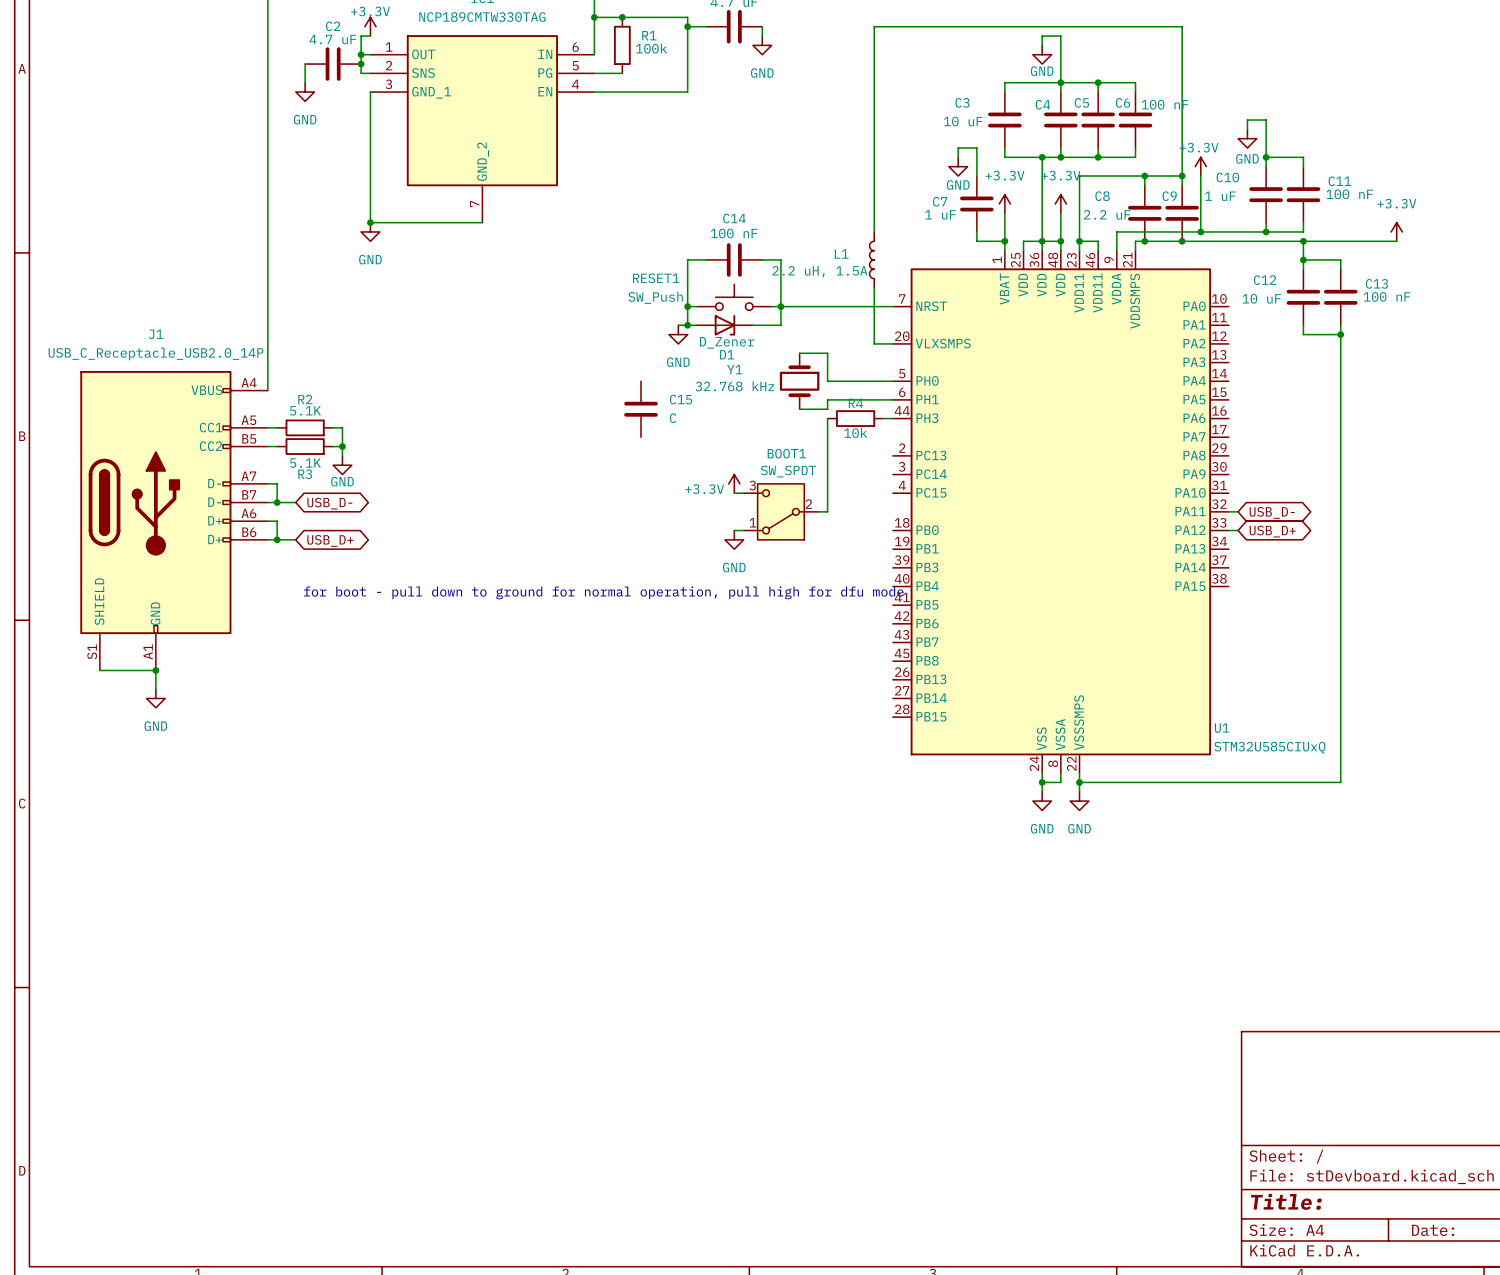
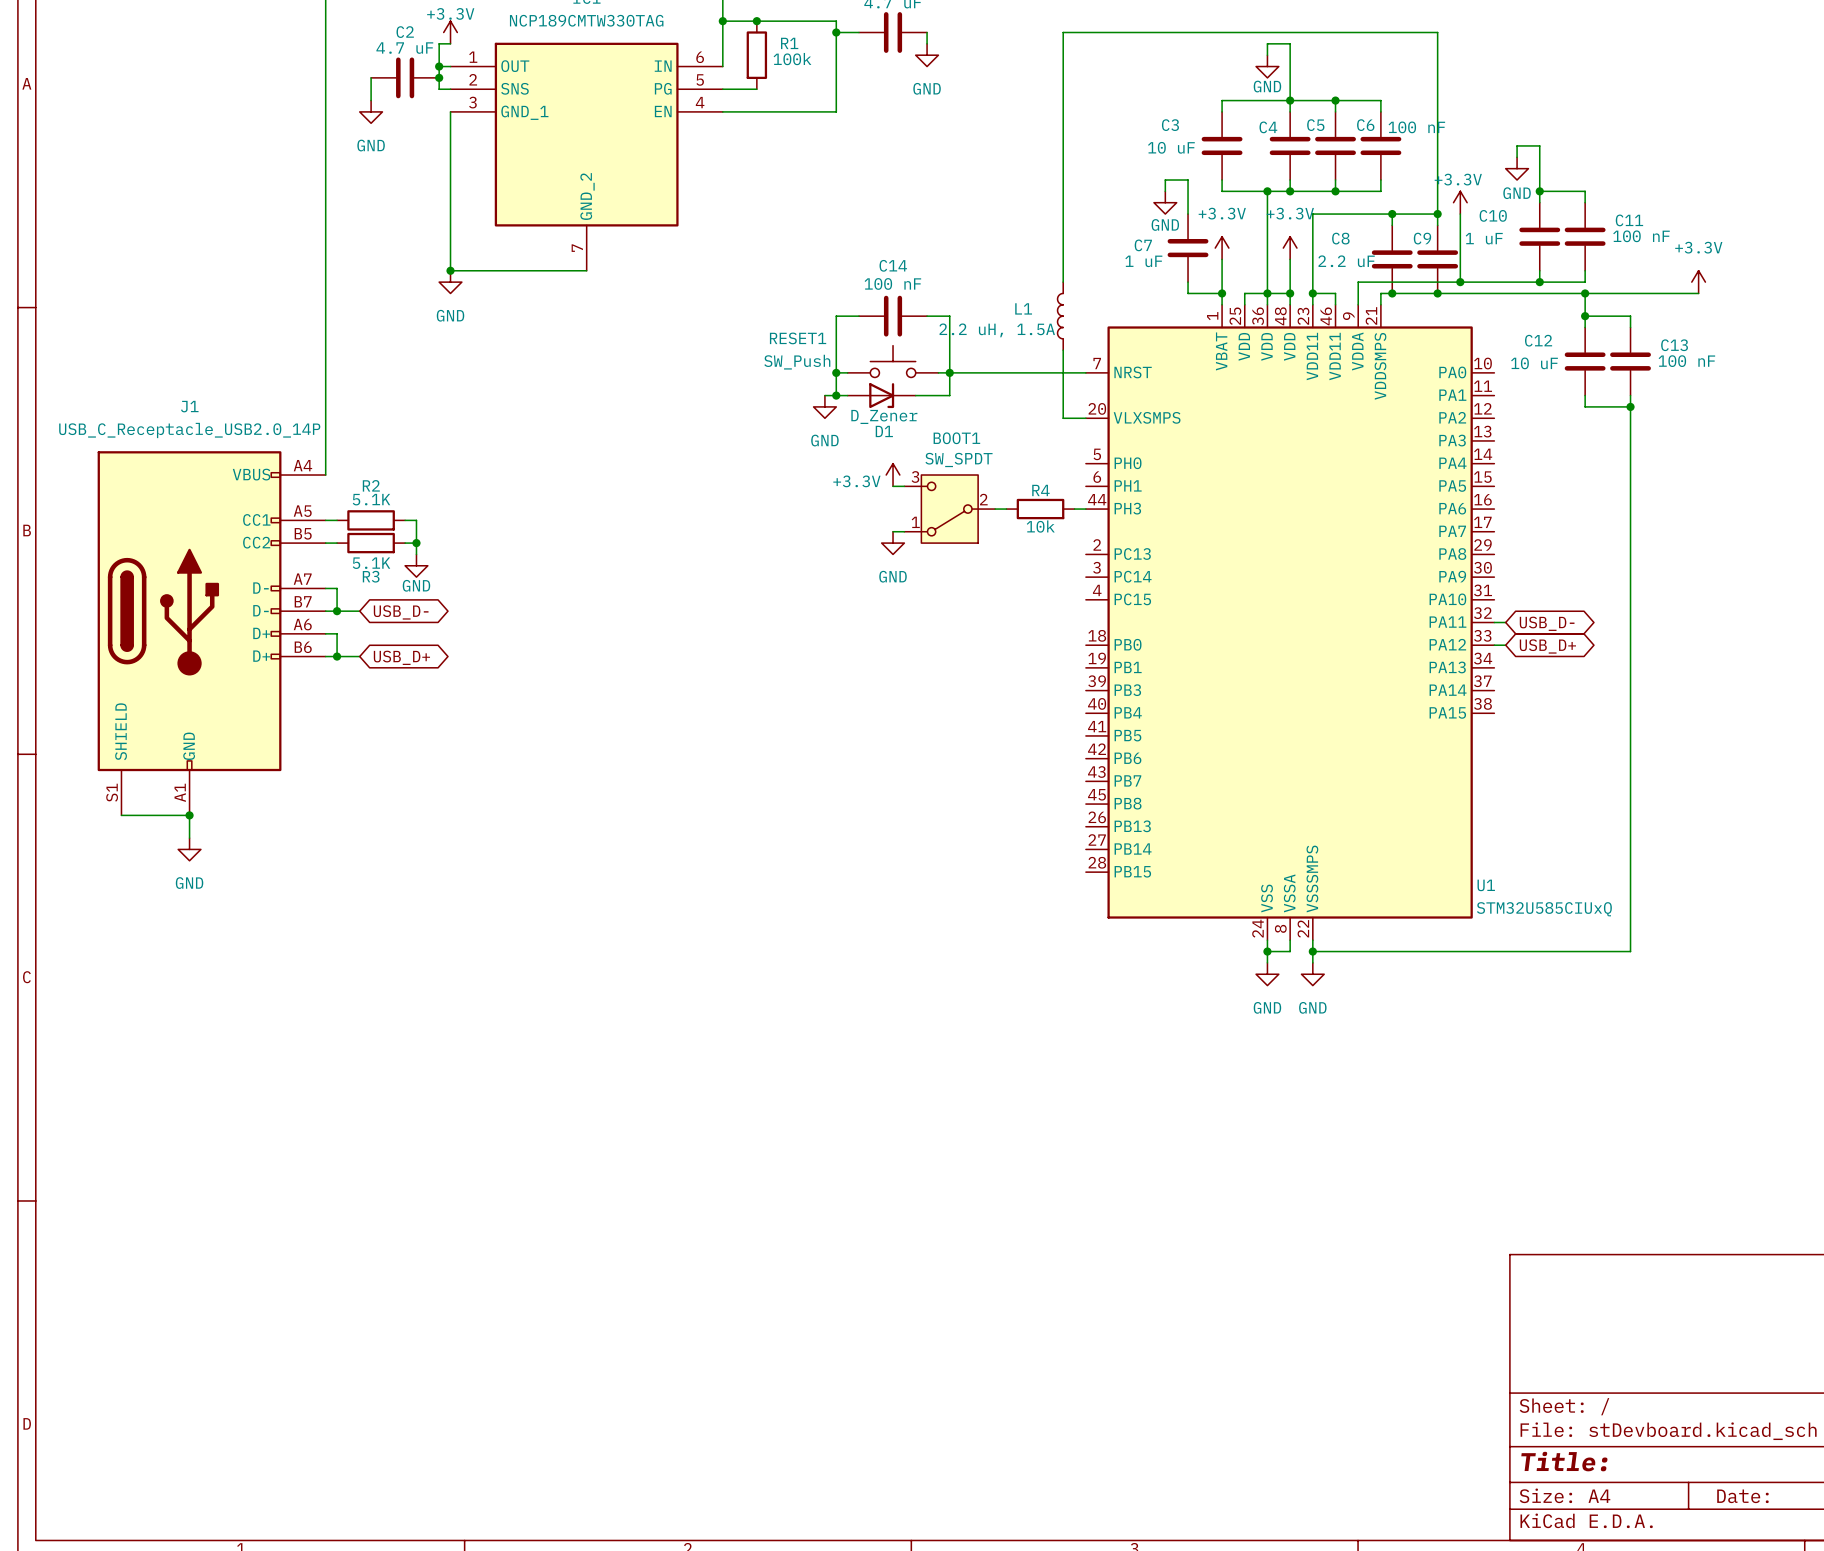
wire: (799, 353) (827, 353) (827, 381) (892, 381) -> none
Y1: 32.768 kHz (799, 381) -> none
wire: (892, 399) (827, 399) (827, 409) (799, 409) -> none
C15: C (641, 409) -> none
wire: (827, 418) (827, 511) (818, 511) -> (1006, 509) (995, 509)
power symbol position: +3.3V (734, 483) -> +3.3V (893, 475)
wire: (734, 493) (743, 493) -> (893, 486) (904, 486)
BOOT1 position: (780, 511) -> (949, 509)
wire: (734, 530) (743, 530) -> (893, 531) (904, 531)
power symbol position: GND (734, 539) -> GND (893, 543)
text: for boot - pull down to ground for normal operation, pull high for dfu mode (603, 592) -> none

